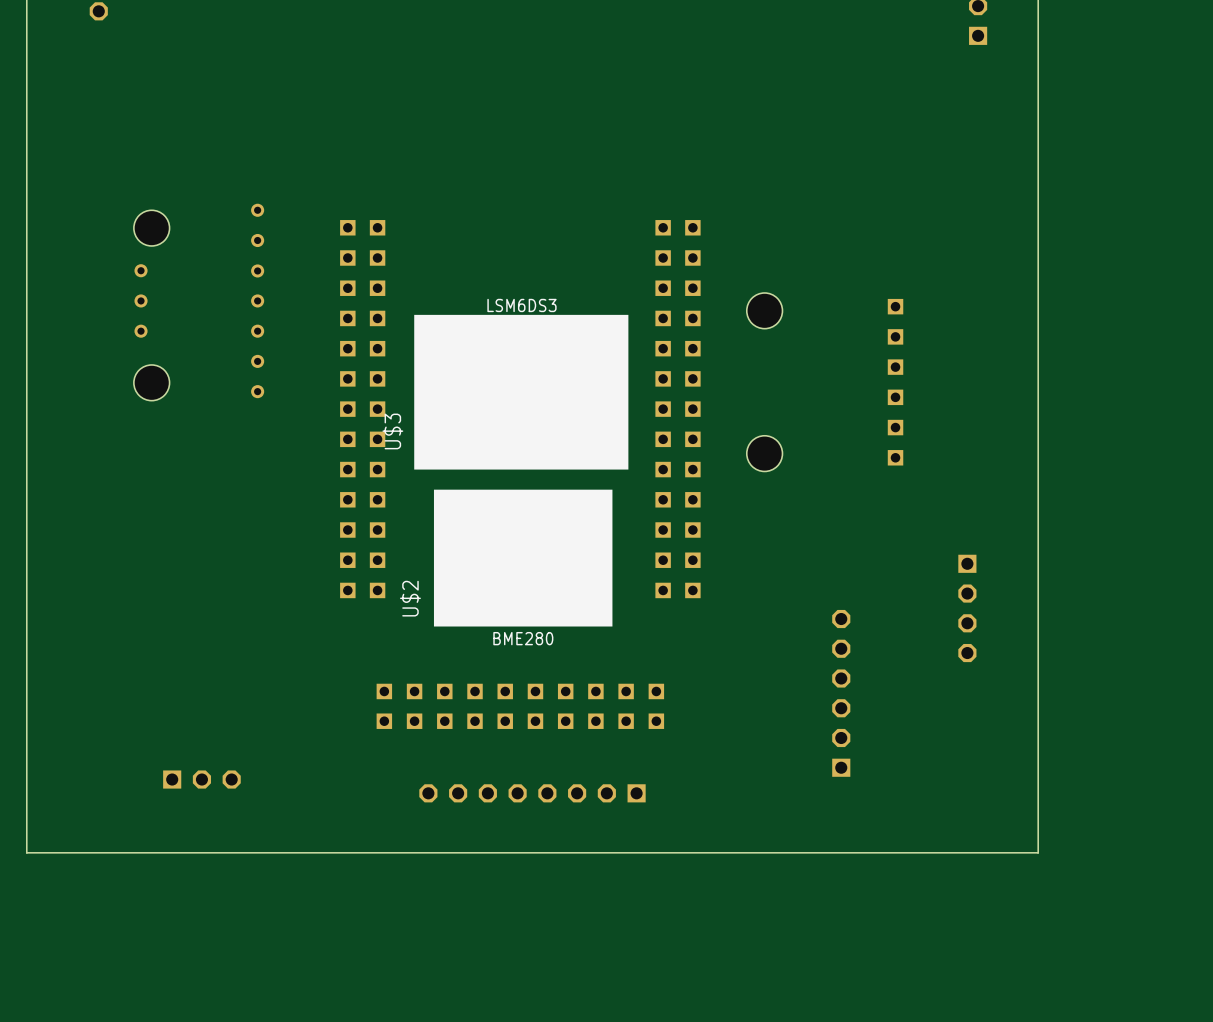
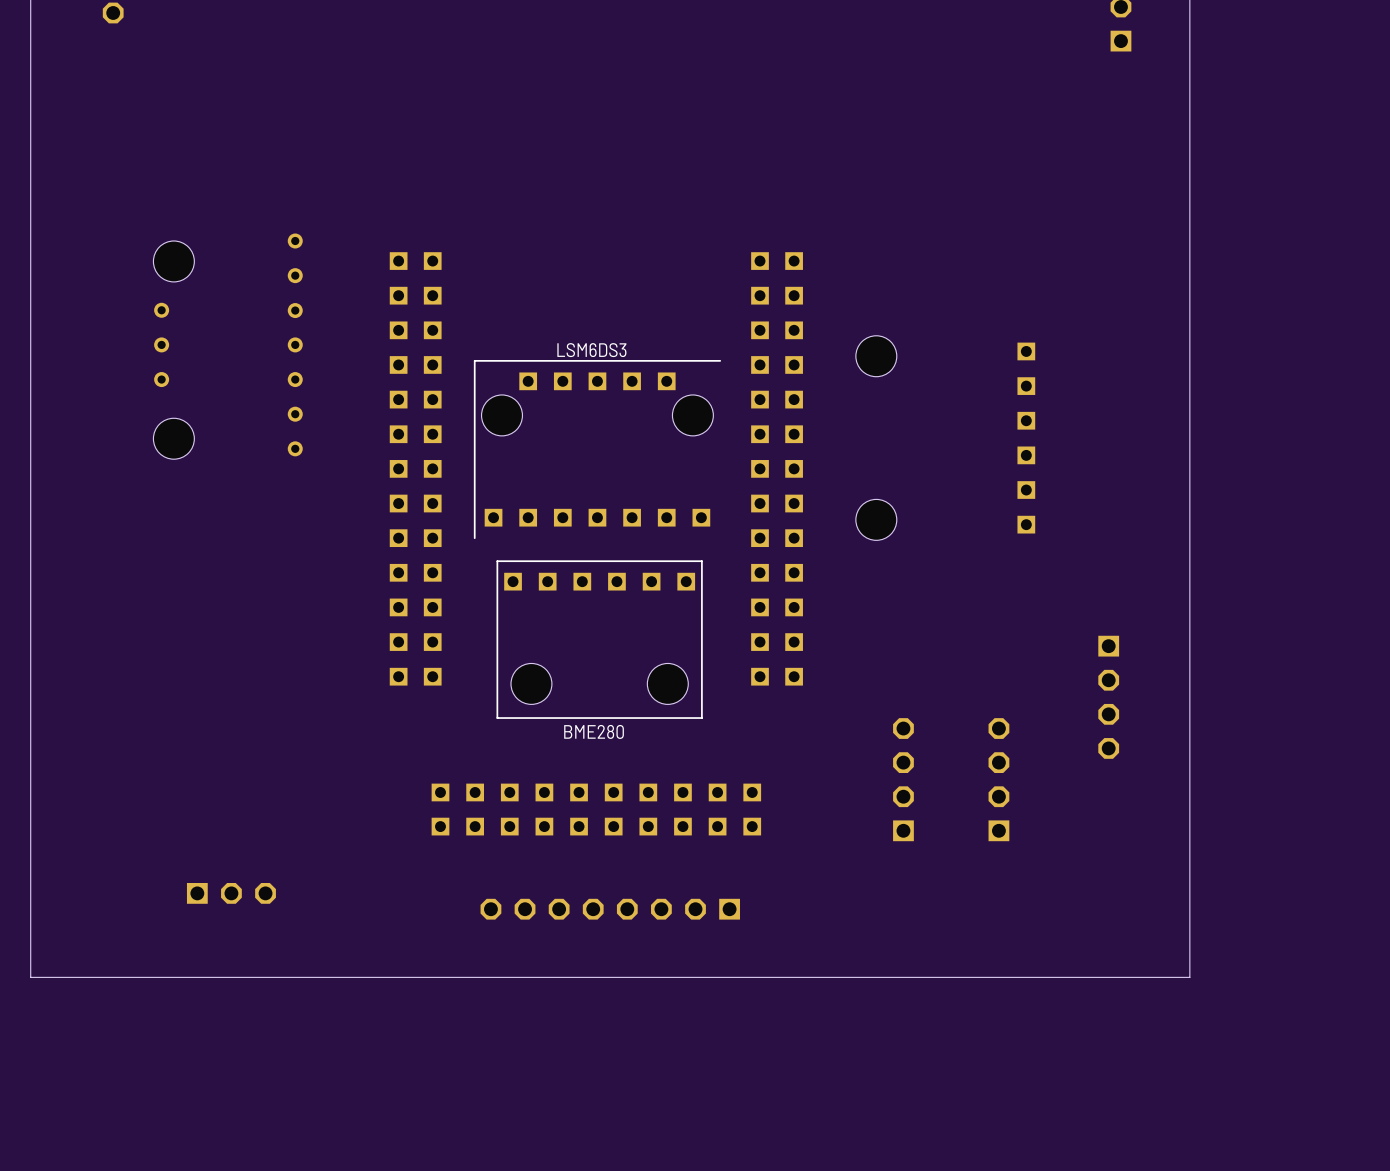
U$3: (521, 392) -> none
part: none -> (597, 449)
U$2: (523, 558) -> none
part: none -> (599, 639)
part: none -> (903, 779)
part: none -> (998, 779)
part: (841, 693) -> none

